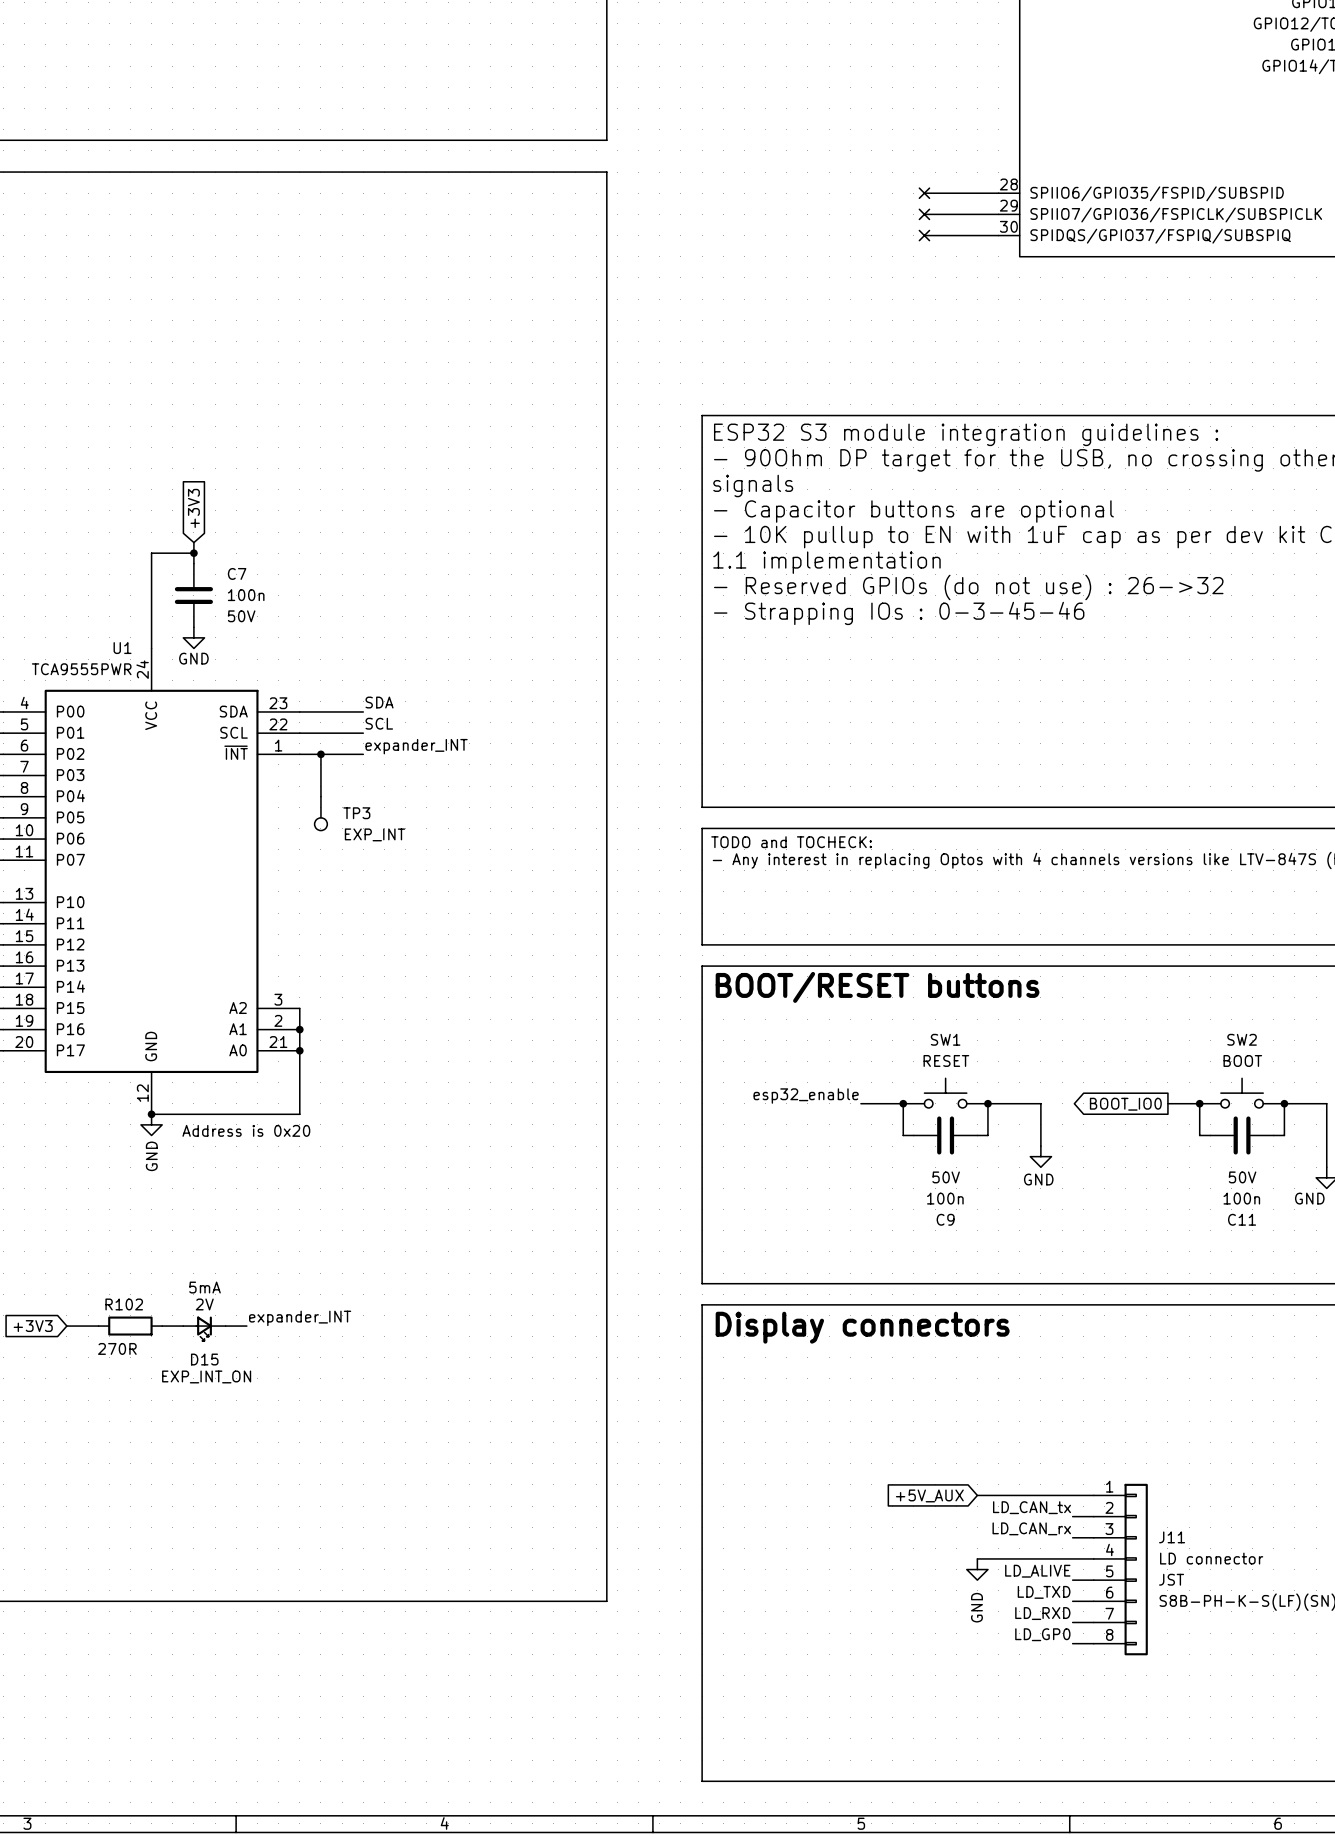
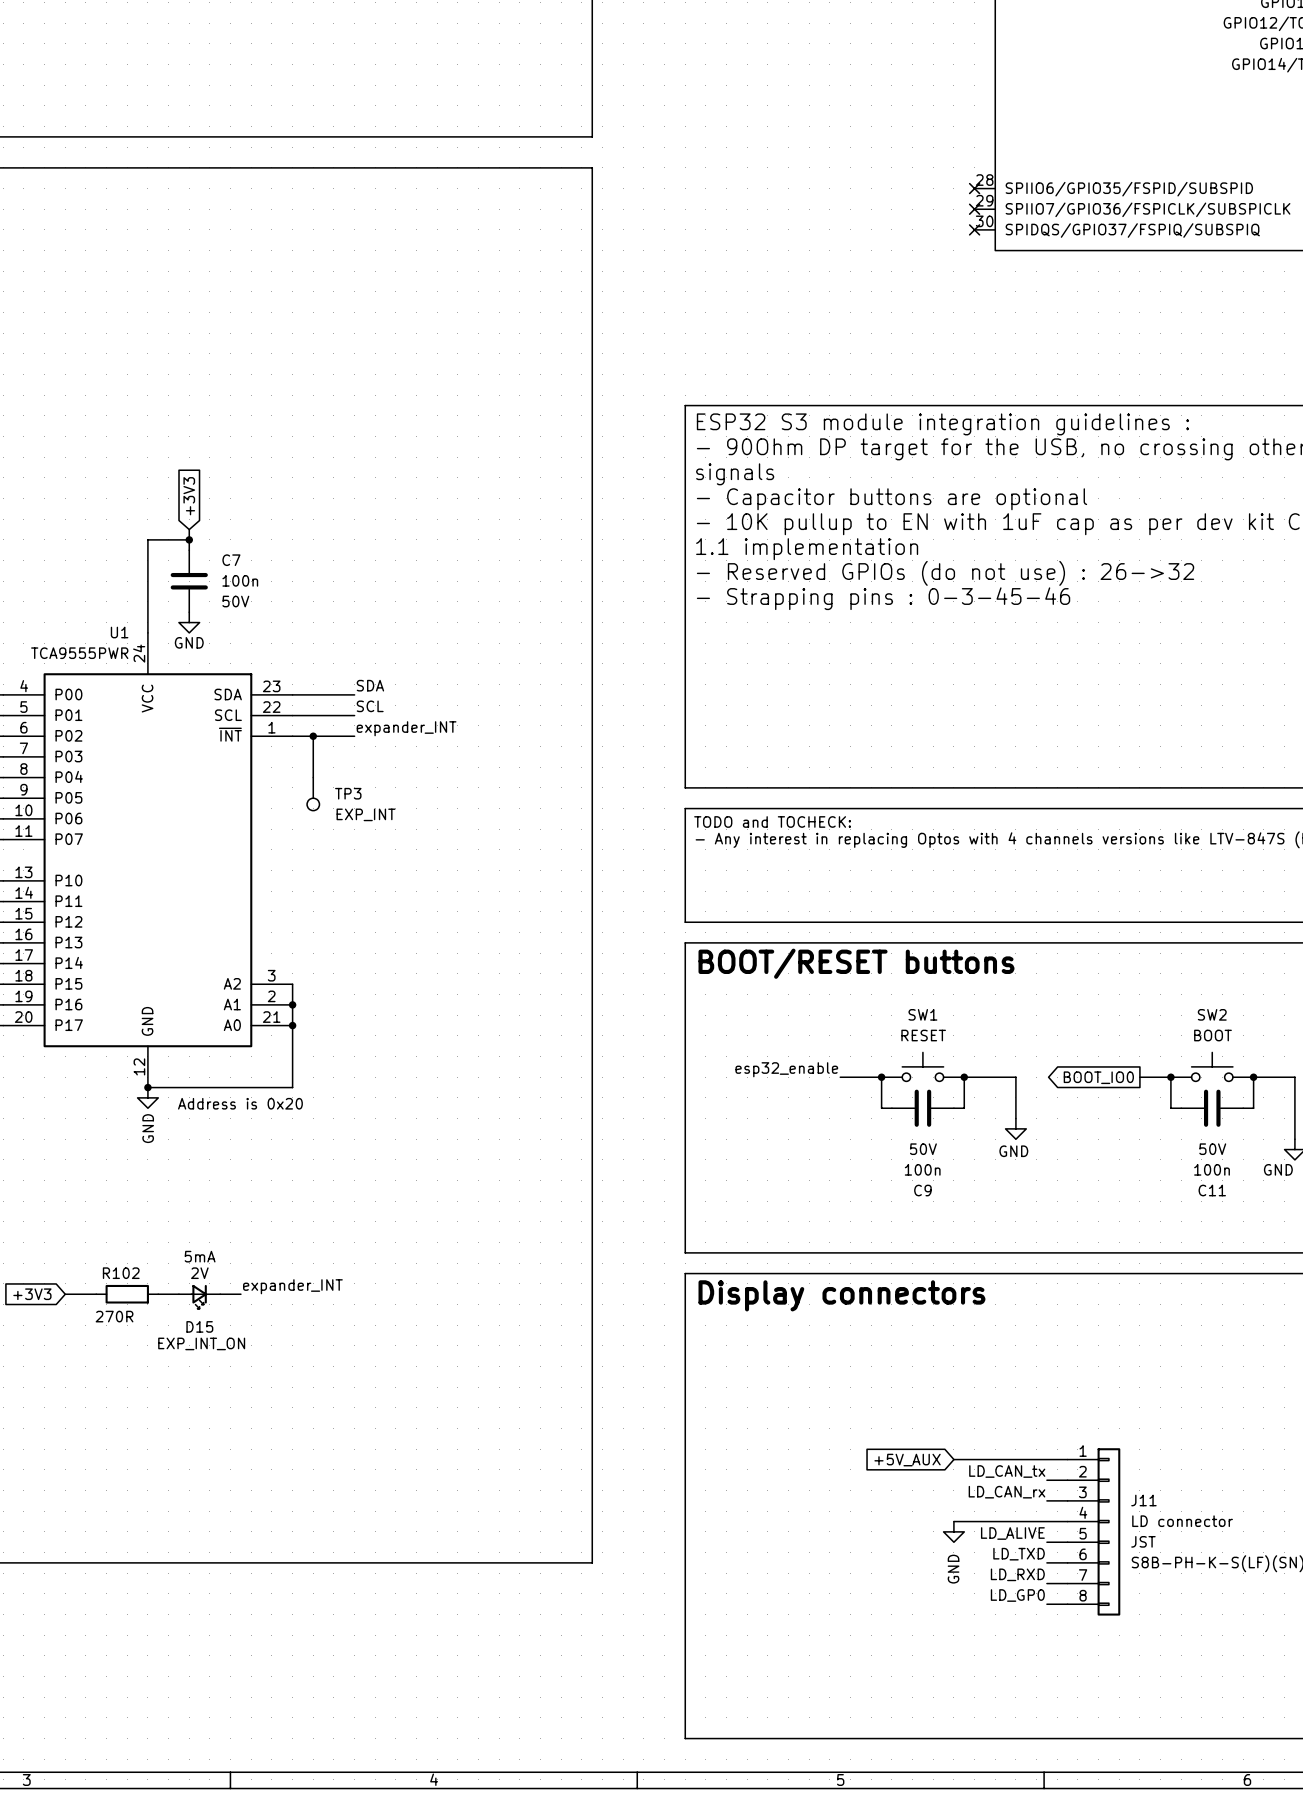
wire: (924, 193) (998, 193) -> none
no-connect mark: (924, 193) -> none
no-connect mark: none -> (974, 188)
wire: (924, 214) (998, 214) -> none
no-connect mark: (924, 214) -> none
no-connect mark: none -> (974, 209)
wire: (924, 235) (998, 235) -> none
no-connect mark: (924, 235) -> none
no-connect mark: none -> (974, 229)
text: - Strapping IOs : 0-3-45-46 (899, 613) -> - Strapping pins : 0-3-45-46 (883, 598)

